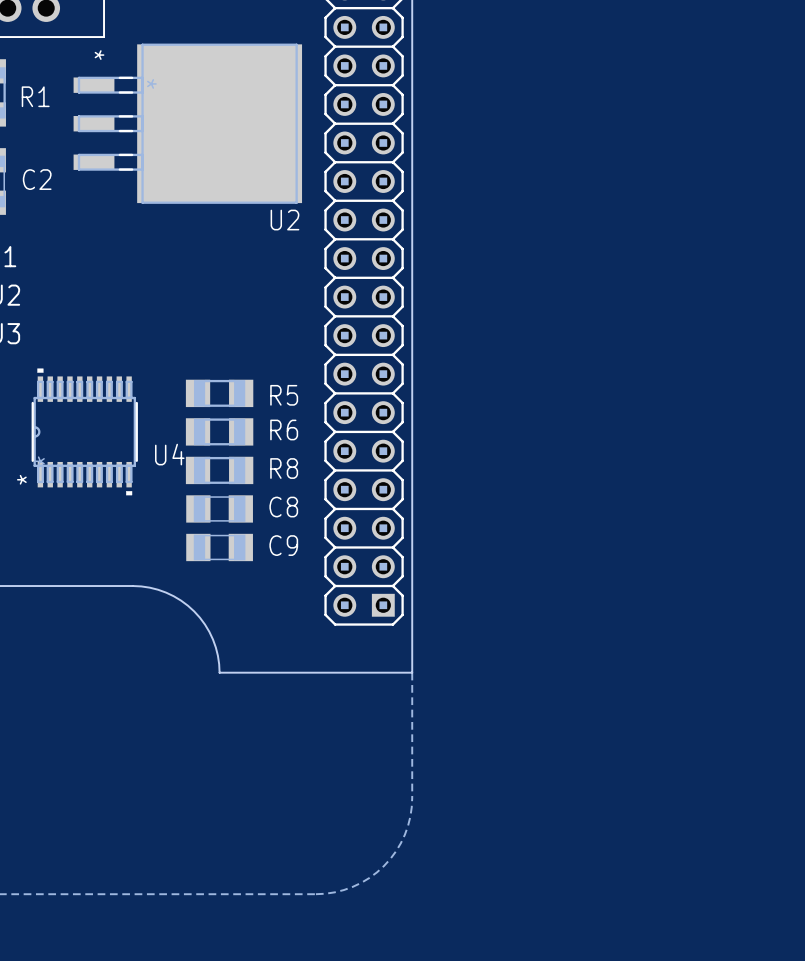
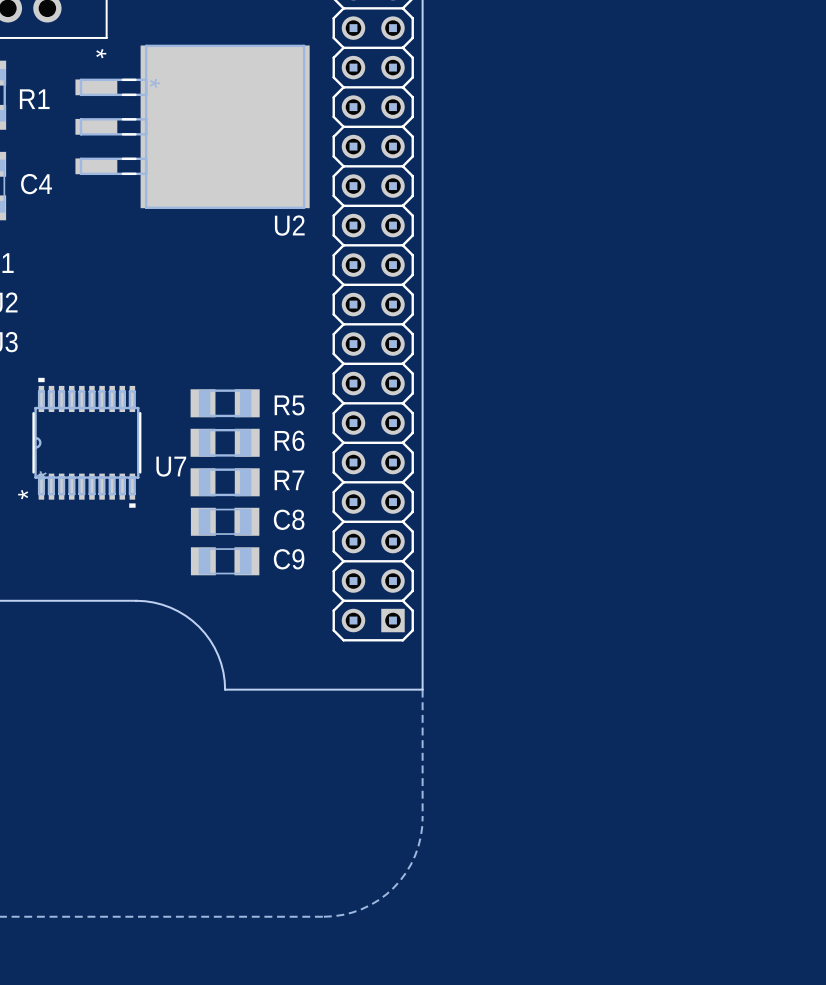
C2 name: C2 (37, 179) -> C4 (36, 184)
U4 name: U4 (169, 454) -> U7 (171, 466)
R8 name: R8 (284, 468) -> R7 (289, 480)

